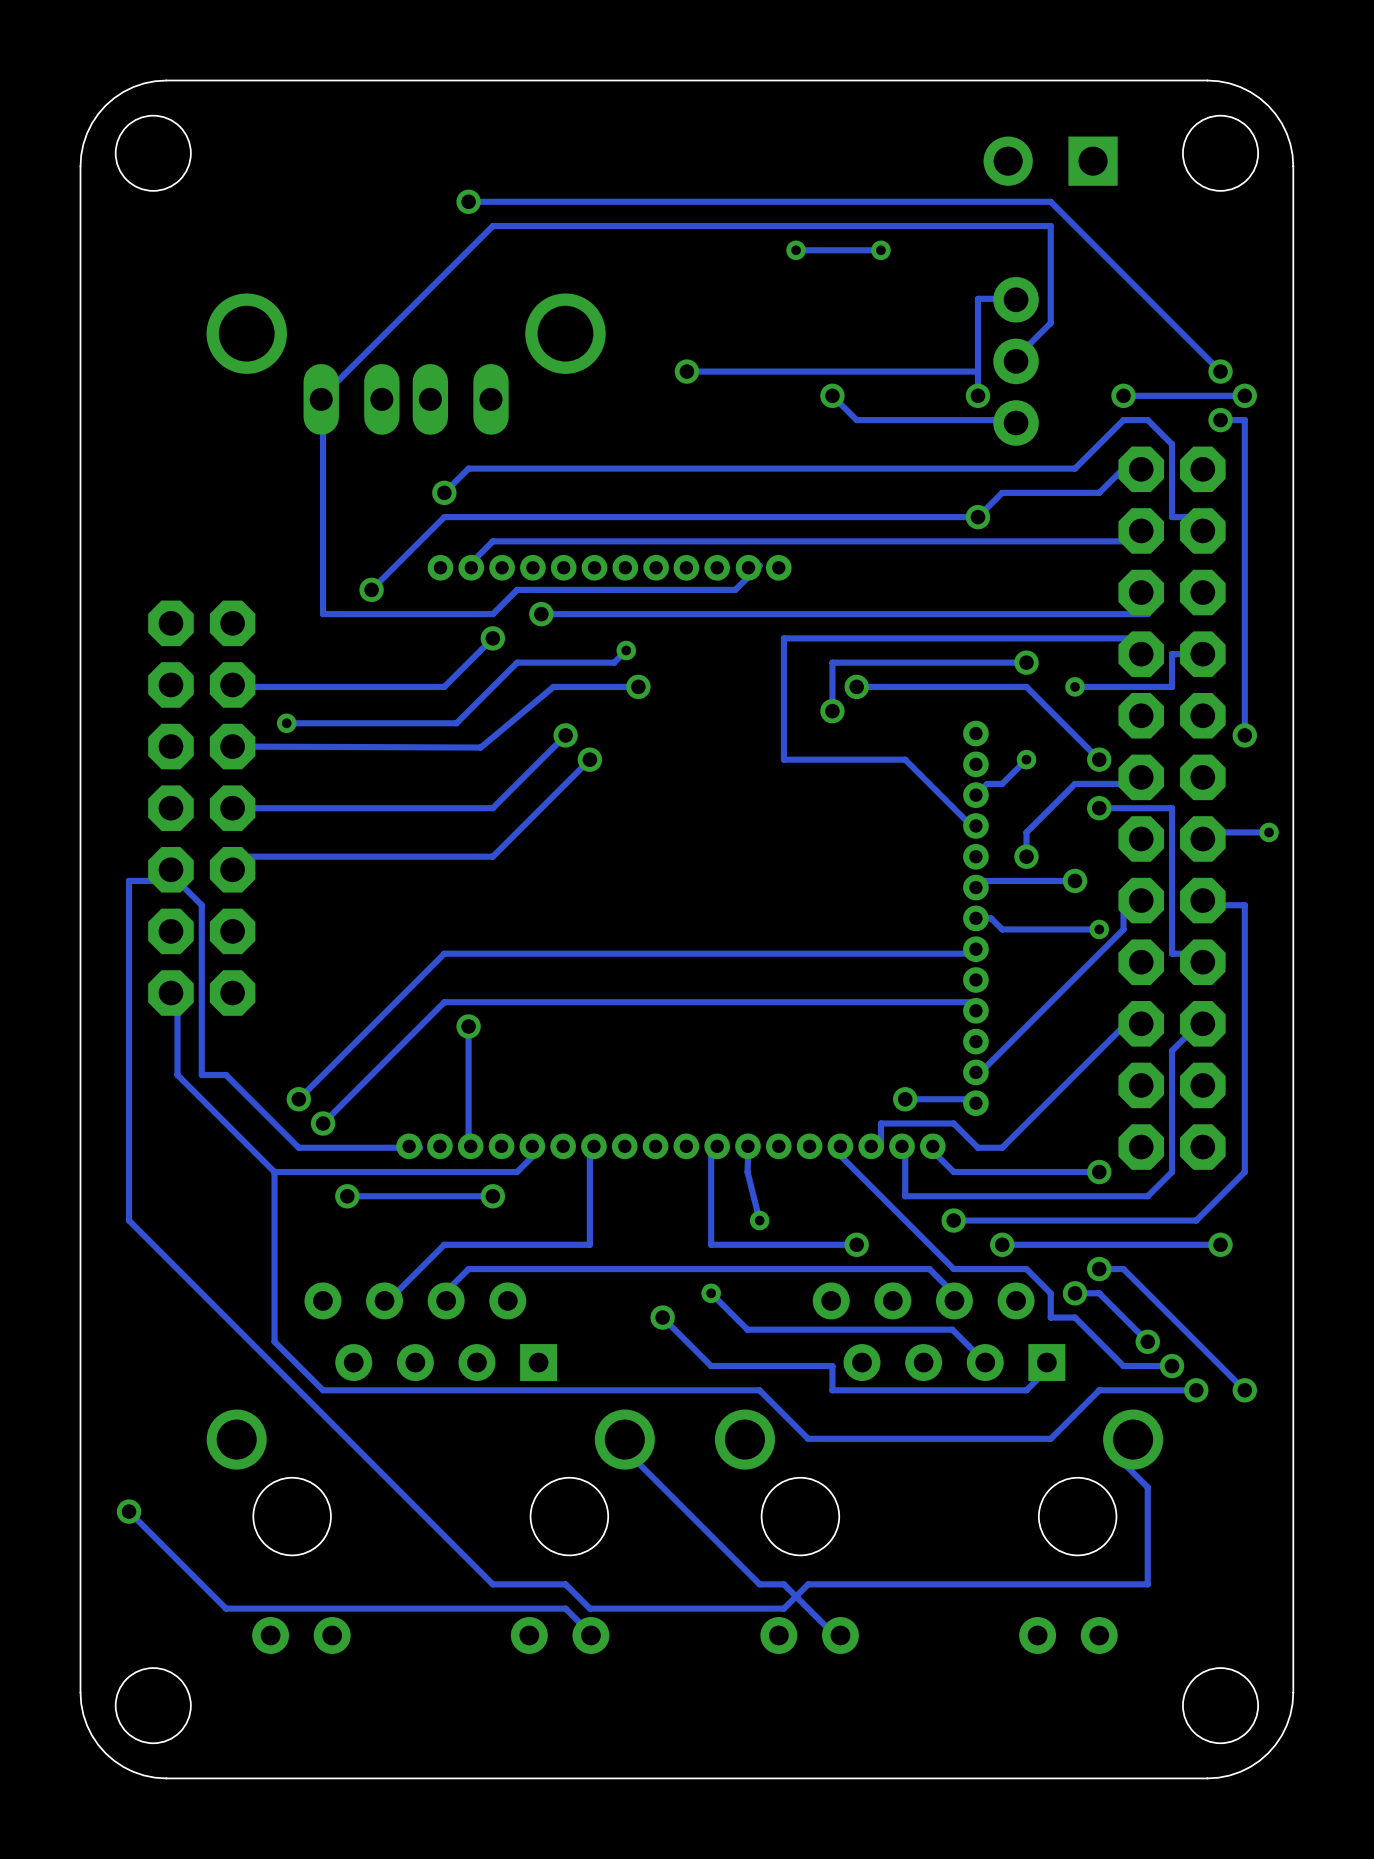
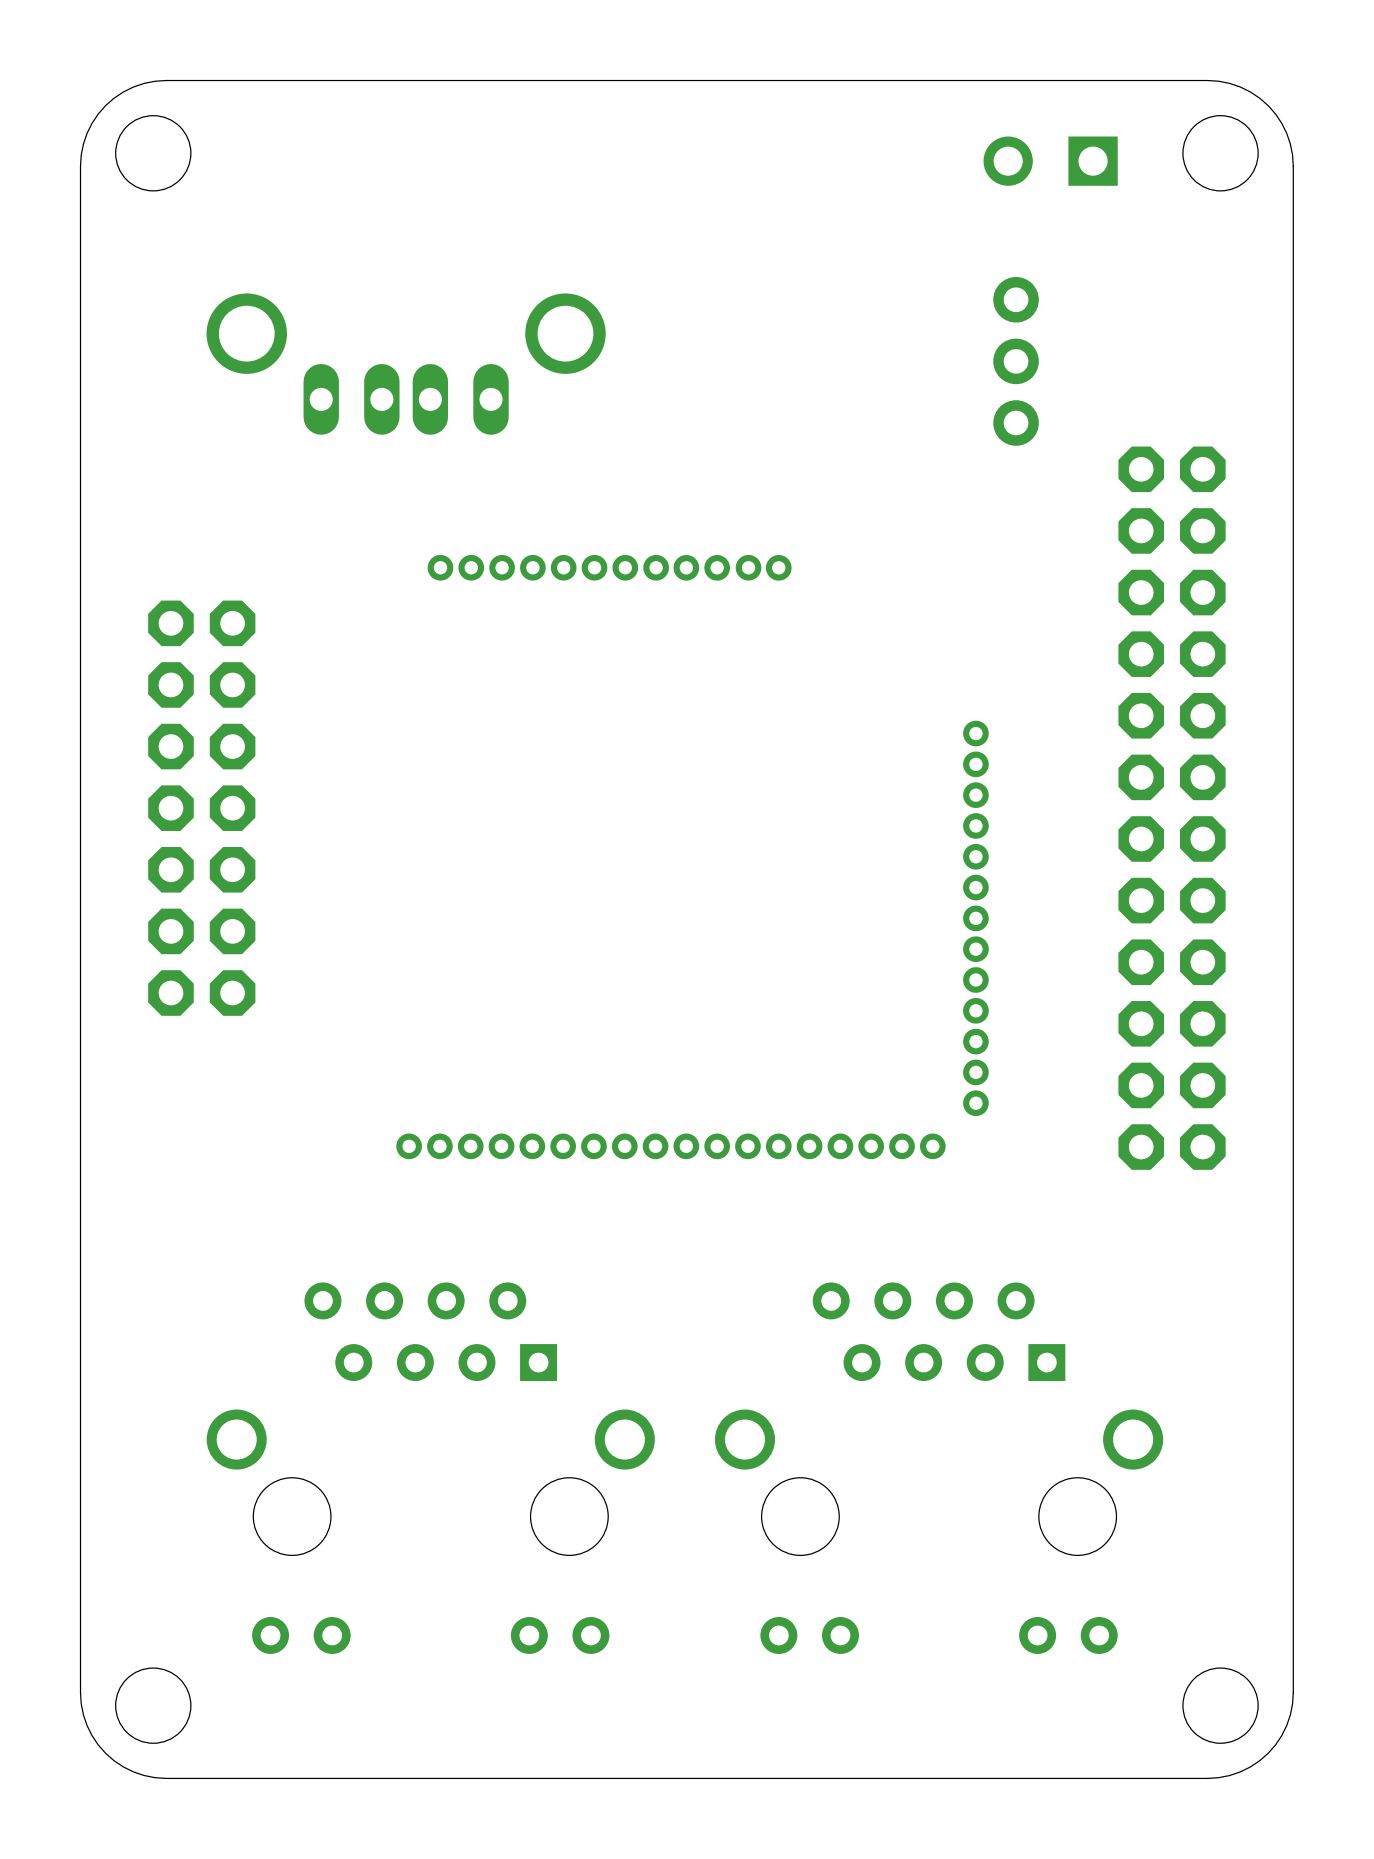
track: (468, 201) (1050, 201) (1220, 371) -> none
via: (468, 201) -> none
via: (796, 250) -> none
track: (880, 250) (796, 250) -> none
via: (880, 250) -> none
track: (1016, 299) (977, 298) (977, 395) -> none
track: (1016, 361) (1026, 347) (1050, 323) (1050, 226) (492, 226) (321, 399) (323, 420) (323, 614) (492, 614) (517, 589) (735, 589) (759, 565) (748, 567) -> none
via: (686, 371) -> none
track: (977, 371) (686, 371) -> none
via: (1220, 371) -> none
track: (832, 395) (856, 420) (1002, 420) (1016, 423) -> none
via: (832, 395) -> none
via: (977, 395) -> none
via: (1123, 395) -> none
track: (1244, 395) (1123, 395) -> none
via: (1244, 395) -> none
track: (1220, 420) (1244, 420) (1244, 735) -> none
via: (1220, 420) -> none
track: (1141, 469) (1123, 468) (1099, 492) (1002, 492) (977, 517) (444, 517) (371, 589) -> none
track: (444, 492) (468, 468) (1075, 468) (1123, 420) (1147, 420) (1172, 444) (1172, 517) (1196, 517) (1202, 530) -> none
via: (444, 492) -> none
via: (977, 517) -> none
track: (1141, 530) (1123, 541) (492, 541) (468, 565) (471, 567) -> none
via: (371, 589) -> none
track: (1141, 592) (1147, 614) (541, 614) -> none
via: (541, 614) -> none
track: (492, 638) (444, 686) (250, 686) (232, 684) -> none
via: (492, 638) -> none
track: (626, 650) (614, 662) (517, 662) (456, 723) (286, 723) -> none
via: (626, 650) -> none
track: (1141, 654) (1147, 638) (783, 638) (783, 759) (905, 759) (977, 832) (975, 825) -> none
track: (1202, 654) (1172, 654) (1172, 686) (1075, 686) -> none
track: (1026, 662) (832, 662) (832, 711) -> none
via: (1026, 662) -> none
track: (638, 686) (553, 686) (480, 747) (232, 746) -> none
via: (638, 686) -> none
track: (856, 686) (1026, 686) (1099, 759) -> none
via: (856, 686) -> none
via: (1075, 686) -> none
via: (832, 711) -> none
via: (286, 723) -> none
track: (565, 735) (492, 808) (232, 808) -> none
via: (565, 735) -> none
via: (1244, 735) -> none
track: (589, 759) (492, 856) (250, 856) (232, 869) -> none
via: (589, 759) -> none
track: (1026, 759) (1002, 783) (987, 783) (975, 795) -> none
via: (1026, 759) -> none
via: (1099, 759) -> none
track: (1141, 777) (1134, 783) (1075, 783) (1026, 832) (1026, 856) -> none
track: (1099, 808) (1172, 808) (1172, 953) (1196, 953) (1202, 962) -> none
via: (1099, 808) -> none
track: (1269, 832) (1220, 832) (1202, 838) -> none
via: (1269, 832) -> none
via: (1026, 856) -> none
track: (1075, 880) (977, 880) (975, 887) -> none
via: (1075, 880) -> none
track: (1141, 900) (1123, 905) (1123, 929) (977, 1075) (975, 1072) -> none
track: (1202, 900) (1220, 905) (1244, 905) (1244, 1172) (1196, 1220) (953, 1220) -> none
track: (975, 918) (991, 918) (1002, 929) (1099, 929) -> none
via: (1099, 929) -> none
track: (975, 949) (977, 953) (444, 953) (298, 1099) -> none
track: (170, 993) (177, 1002) (177, 1075) (274, 1172) -> none
track: (975, 1010) (977, 1002) (444, 1002) (323, 1123) -> none
track: (1141, 1023) (1123, 1026) (1002, 1147) (977, 1147) (953, 1123) (880, 1123) (880, 1147) (871, 1146) -> none
track: (1202, 1023) (1196, 1026) (1172, 1050) (1172, 1172) (1147, 1196) (905, 1196) (905, 1147) (902, 1146) -> none
track: (468, 1026) (468, 1147) (470, 1146) -> none
via: (468, 1026) -> none
via: (298, 1099) -> none
track: (905, 1099) (977, 1099) (975, 1103) -> none
via: (905, 1099) -> none
via: (323, 1123) -> none
track: (409, 1146) (420, 1147) (298, 1147) (226, 1075) (201, 1075) (201, 905) (177, 880) (170, 869) (153, 880) (129, 880) (129, 1220) (492, 1584) (565, 1584) (589, 1608) (783, 1608) (808, 1584) (1147, 1584) (1147, 1487) (1123, 1463) (1133, 1439) -> none
track: (532, 1146) (541, 1147) (517, 1172) (274, 1172) -> none
track: (593, 1146) (589, 1147) (589, 1244) (444, 1244) (395, 1293) (384, 1300) -> none
track: (717, 1146) (711, 1147) (711, 1244) (856, 1244) -> none
track: (747, 1146) (747, 1172) (759, 1220) -> none
track: (840, 1146) (832, 1147) (953, 1269) (1026, 1269) (1050, 1293) (1050, 1317) (1075, 1317) (1123, 1366) (1172, 1366) -> none
track: (932, 1146) (929, 1147) (953, 1172) (1099, 1172) -> none
track: (274, 1172) (274, 1341) (323, 1390) (759, 1390) (808, 1438) (1050, 1438) (1099, 1390) (1196, 1390) -> none
via: (1099, 1172) -> none
via: (347, 1196) -> none
track: (492, 1196) (347, 1196) -> none
via: (492, 1196) -> none
via: (759, 1220) -> none
via: (953, 1220) -> none
via: (856, 1244) -> none
via: (1002, 1244) -> none
track: (1220, 1244) (1002, 1244) -> none
via: (1220, 1244) -> none
track: (1099, 1269) (1123, 1269) (1244, 1390) -> none
via: (1099, 1269) -> none
track: (711, 1293) (747, 1329) (952, 1329) (985, 1362) -> none
via: (711, 1293) -> none
track: (1075, 1293) (1099, 1293) (1147, 1341) -> none
via: (1075, 1293) -> none
track: (954, 1300) (953, 1293) (929, 1269) (468, 1269) (444, 1293) (446, 1300) -> none
track: (662, 1317) (711, 1366) (832, 1366) (832, 1390) (1026, 1390) (1050, 1366) (1046, 1362) -> none
via: (662, 1317) -> none
via: (1147, 1341) -> none
via: (1172, 1366) -> none
via: (1196, 1390) -> none
via: (1244, 1390) -> none
track: (624, 1439) (638, 1463) (759, 1584) (783, 1584) (832, 1632) (840, 1635) -> none
track: (129, 1511) (226, 1608) (565, 1608) (590, 1635) -> none
via: (129, 1511) -> none

